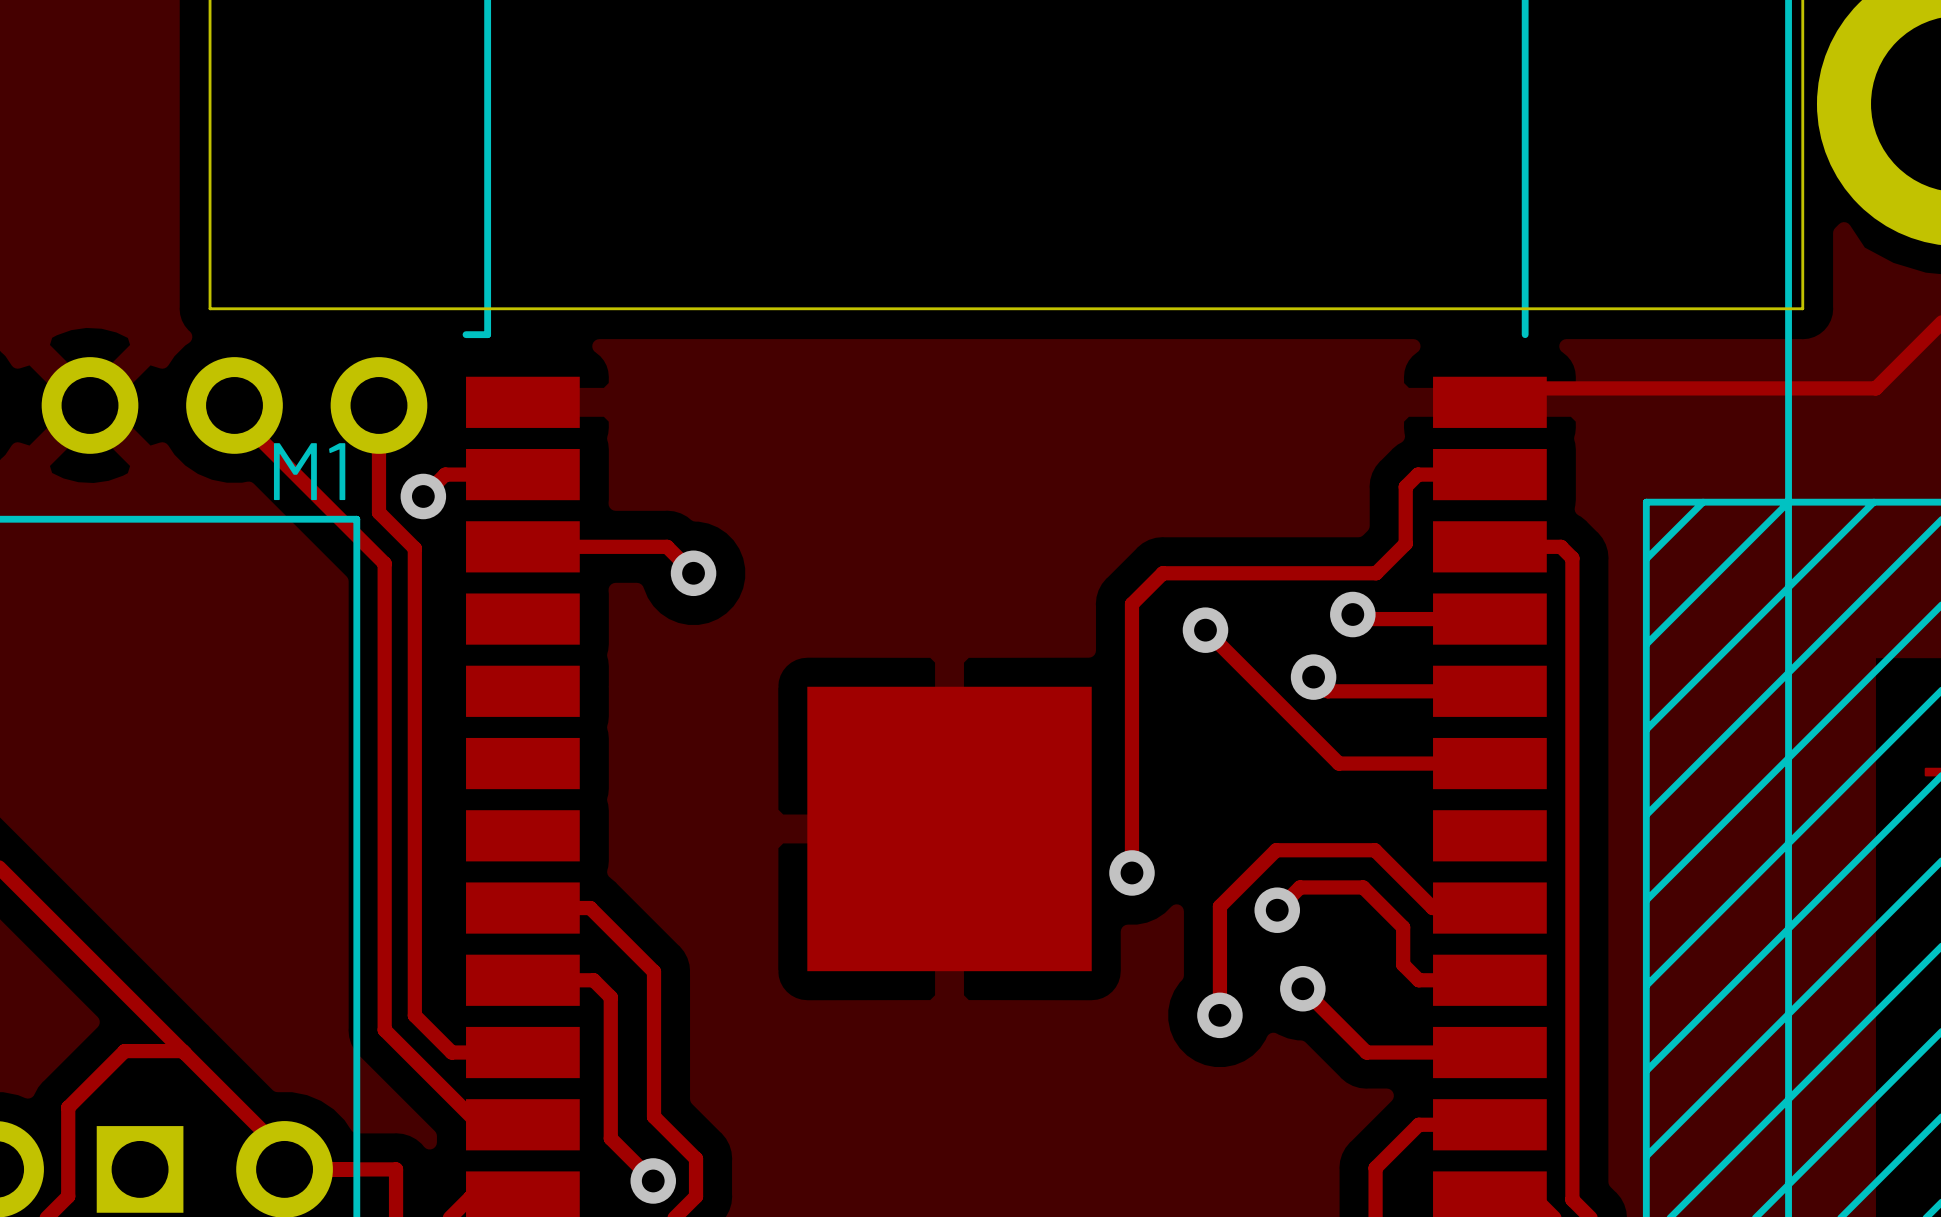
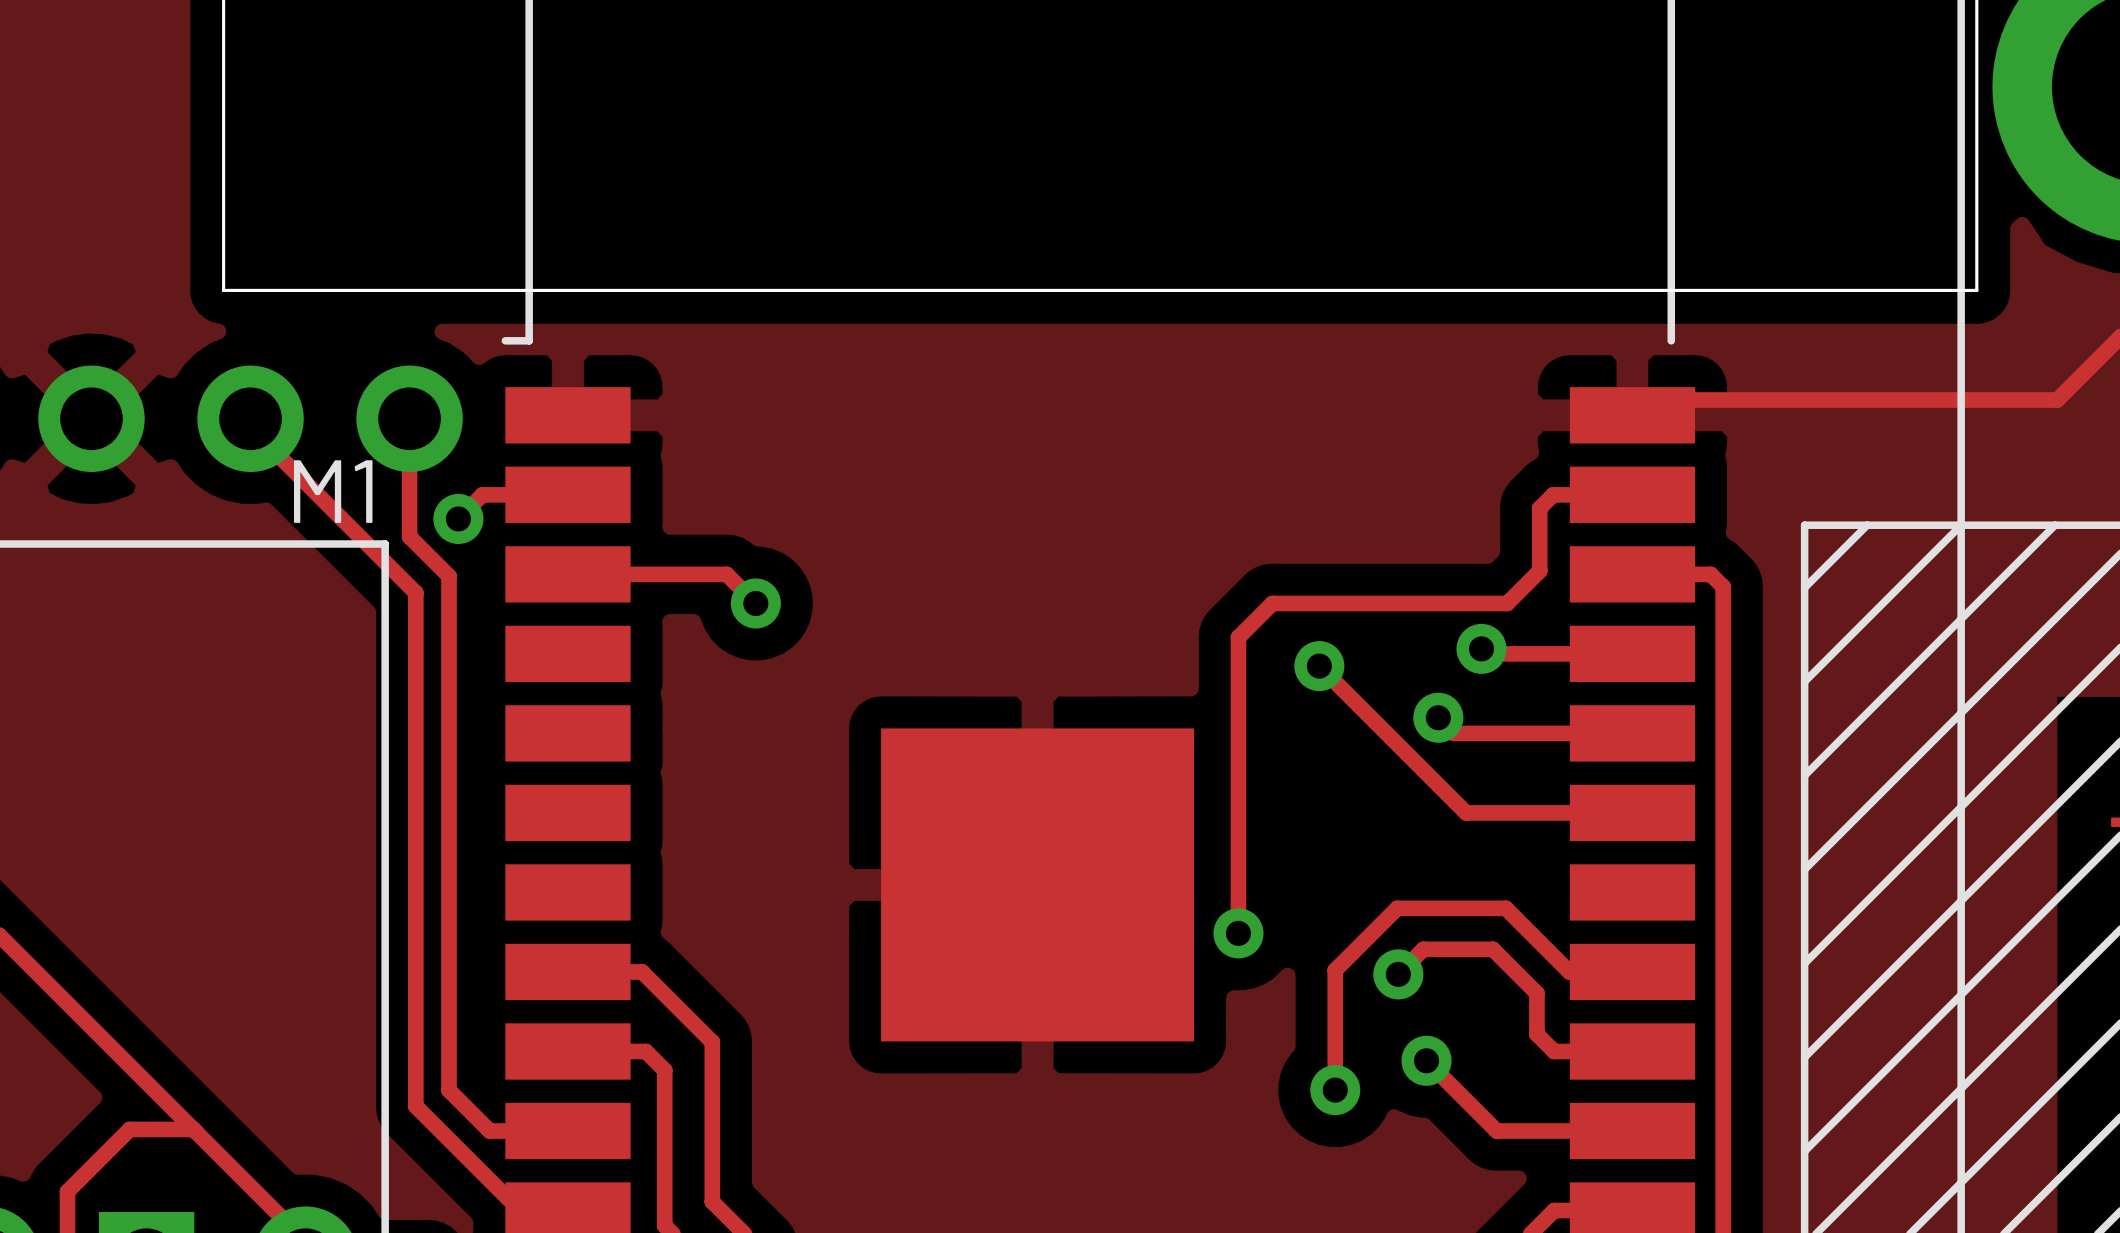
board edge: (210, 288) (210, 308) (1802, 308) (1802, 288) -> (223, 290) (1976, 290)

